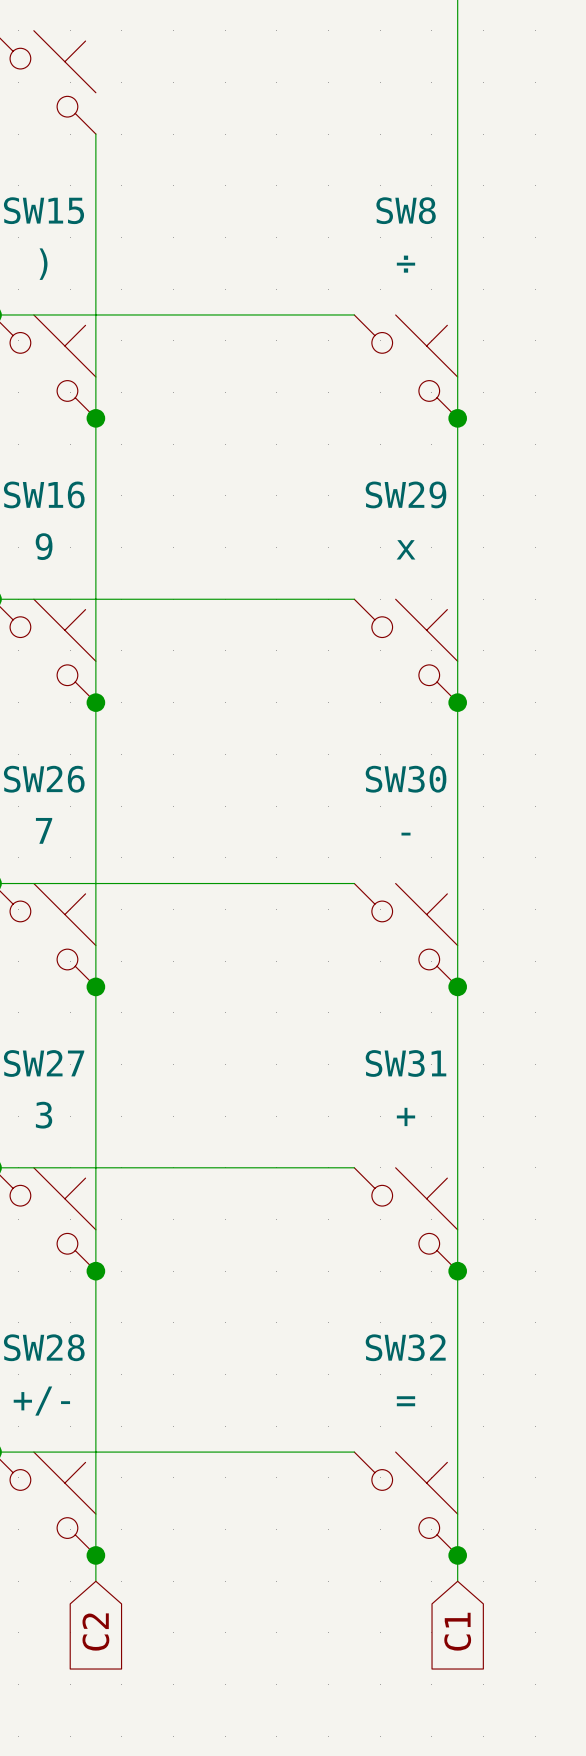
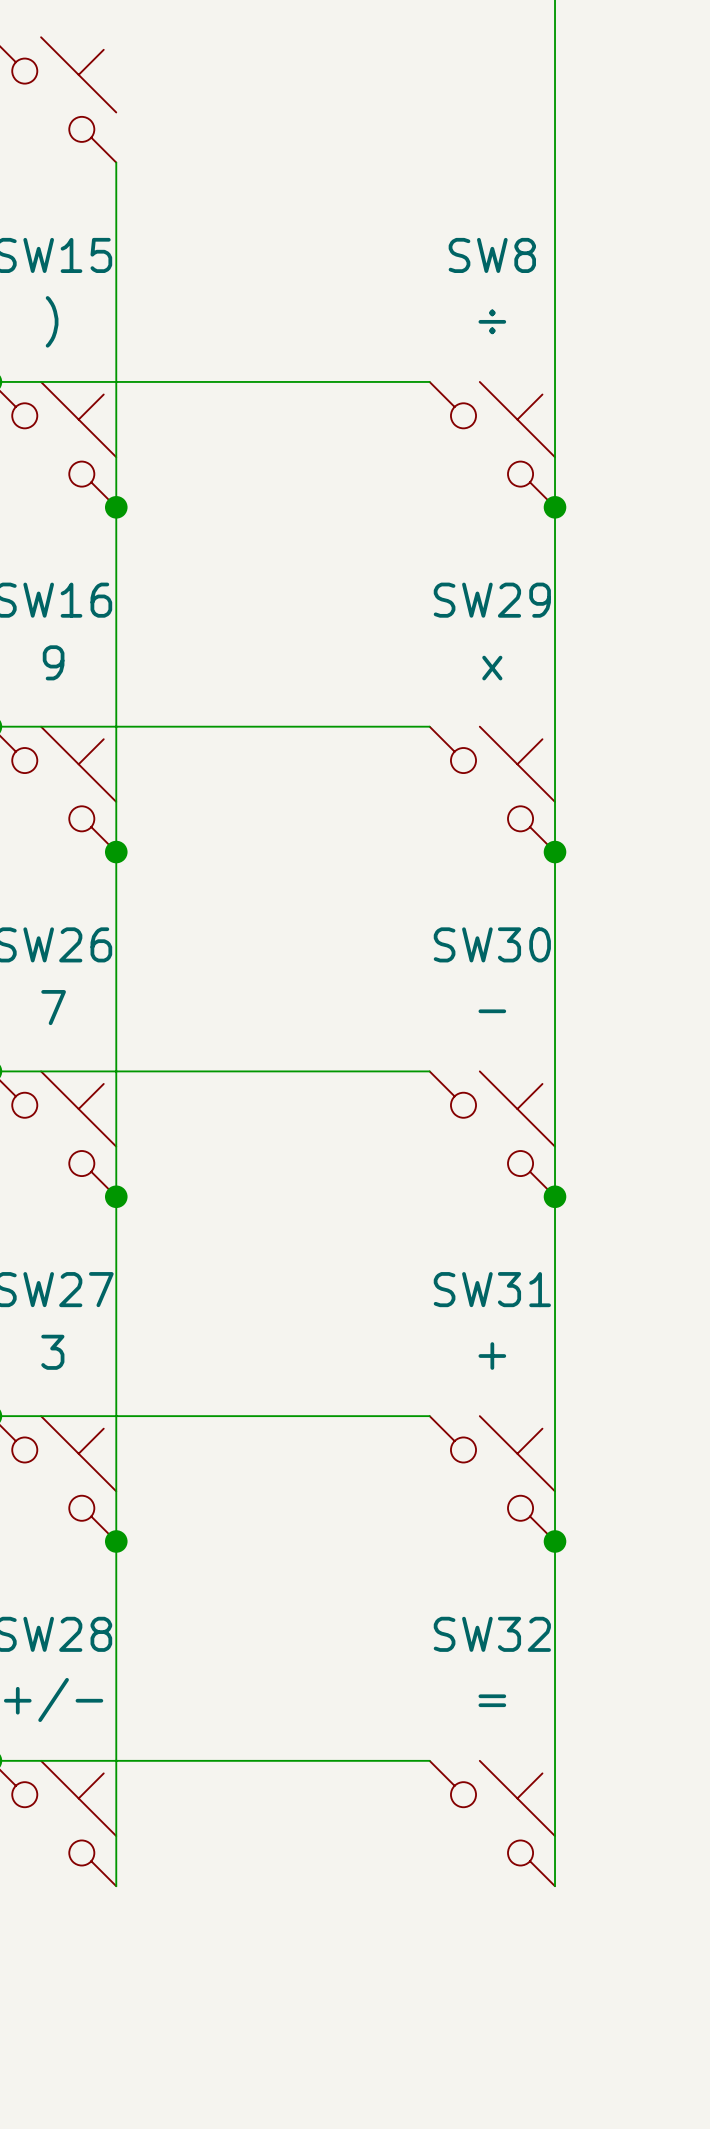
wire: (95, 1555) (95, 1581) -> none
junction: (95, 1555) -> none
wire: (457, 1555) (457, 1581) -> none
junction: (457, 1555) -> none
global label: C1 (457, 1631) -> none
global label: C2 (95, 1632) -> none

